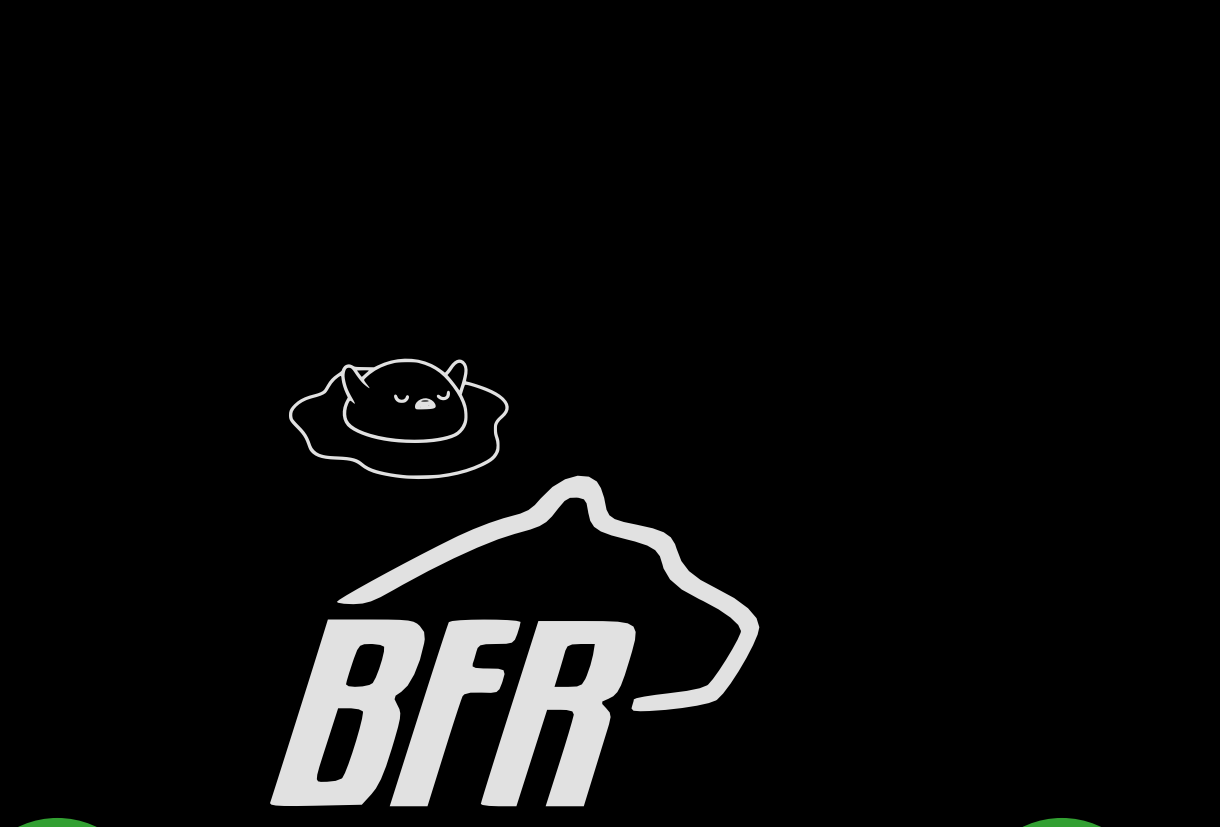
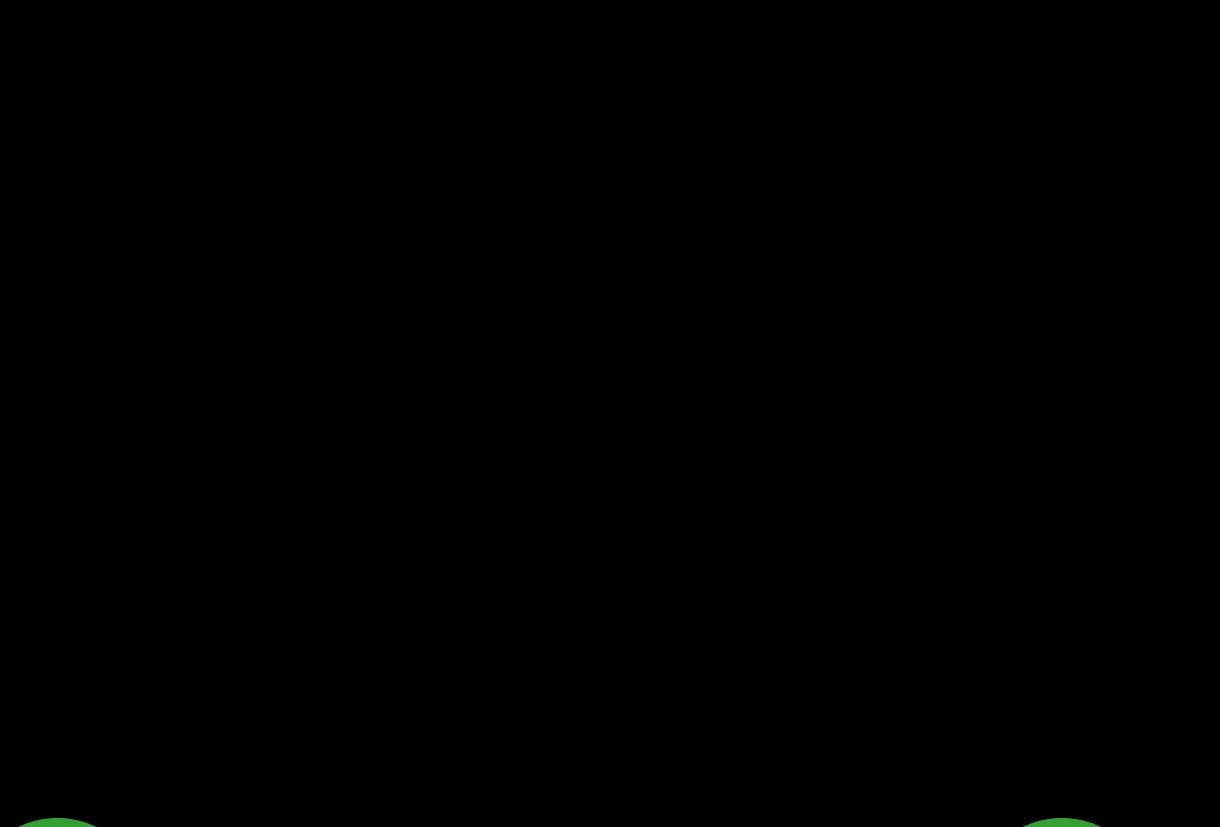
drawing: [270, 358, 760, 807] -> none

